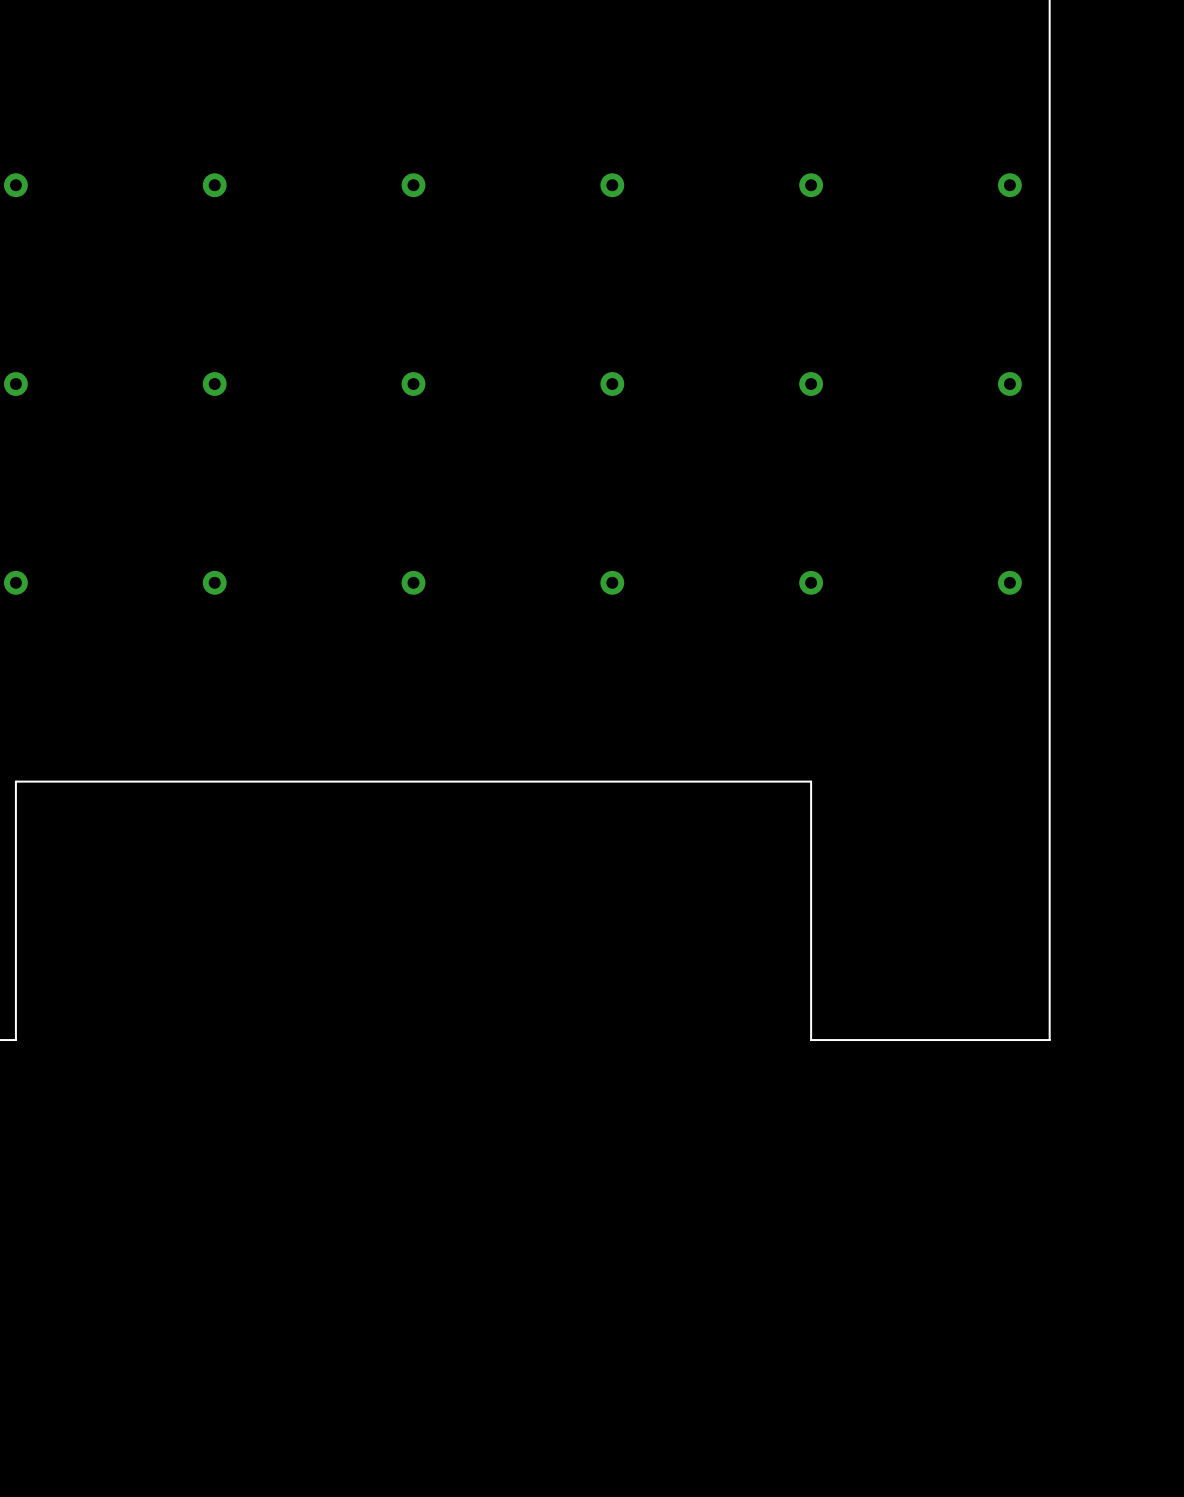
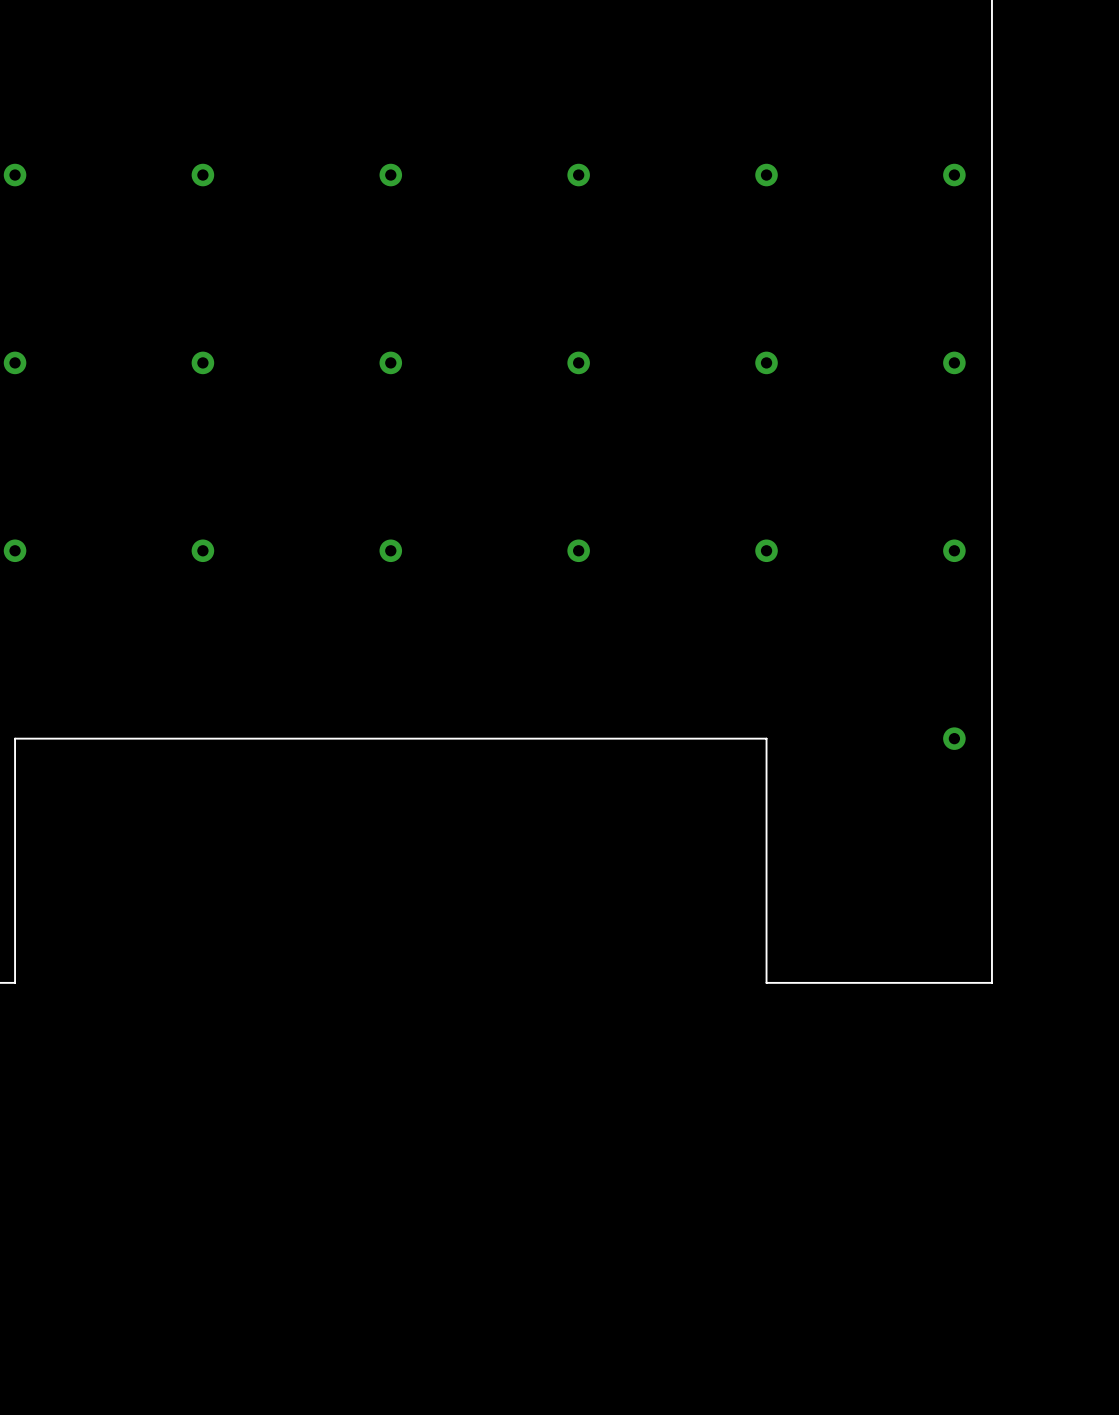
via: none -> (954, 738)

